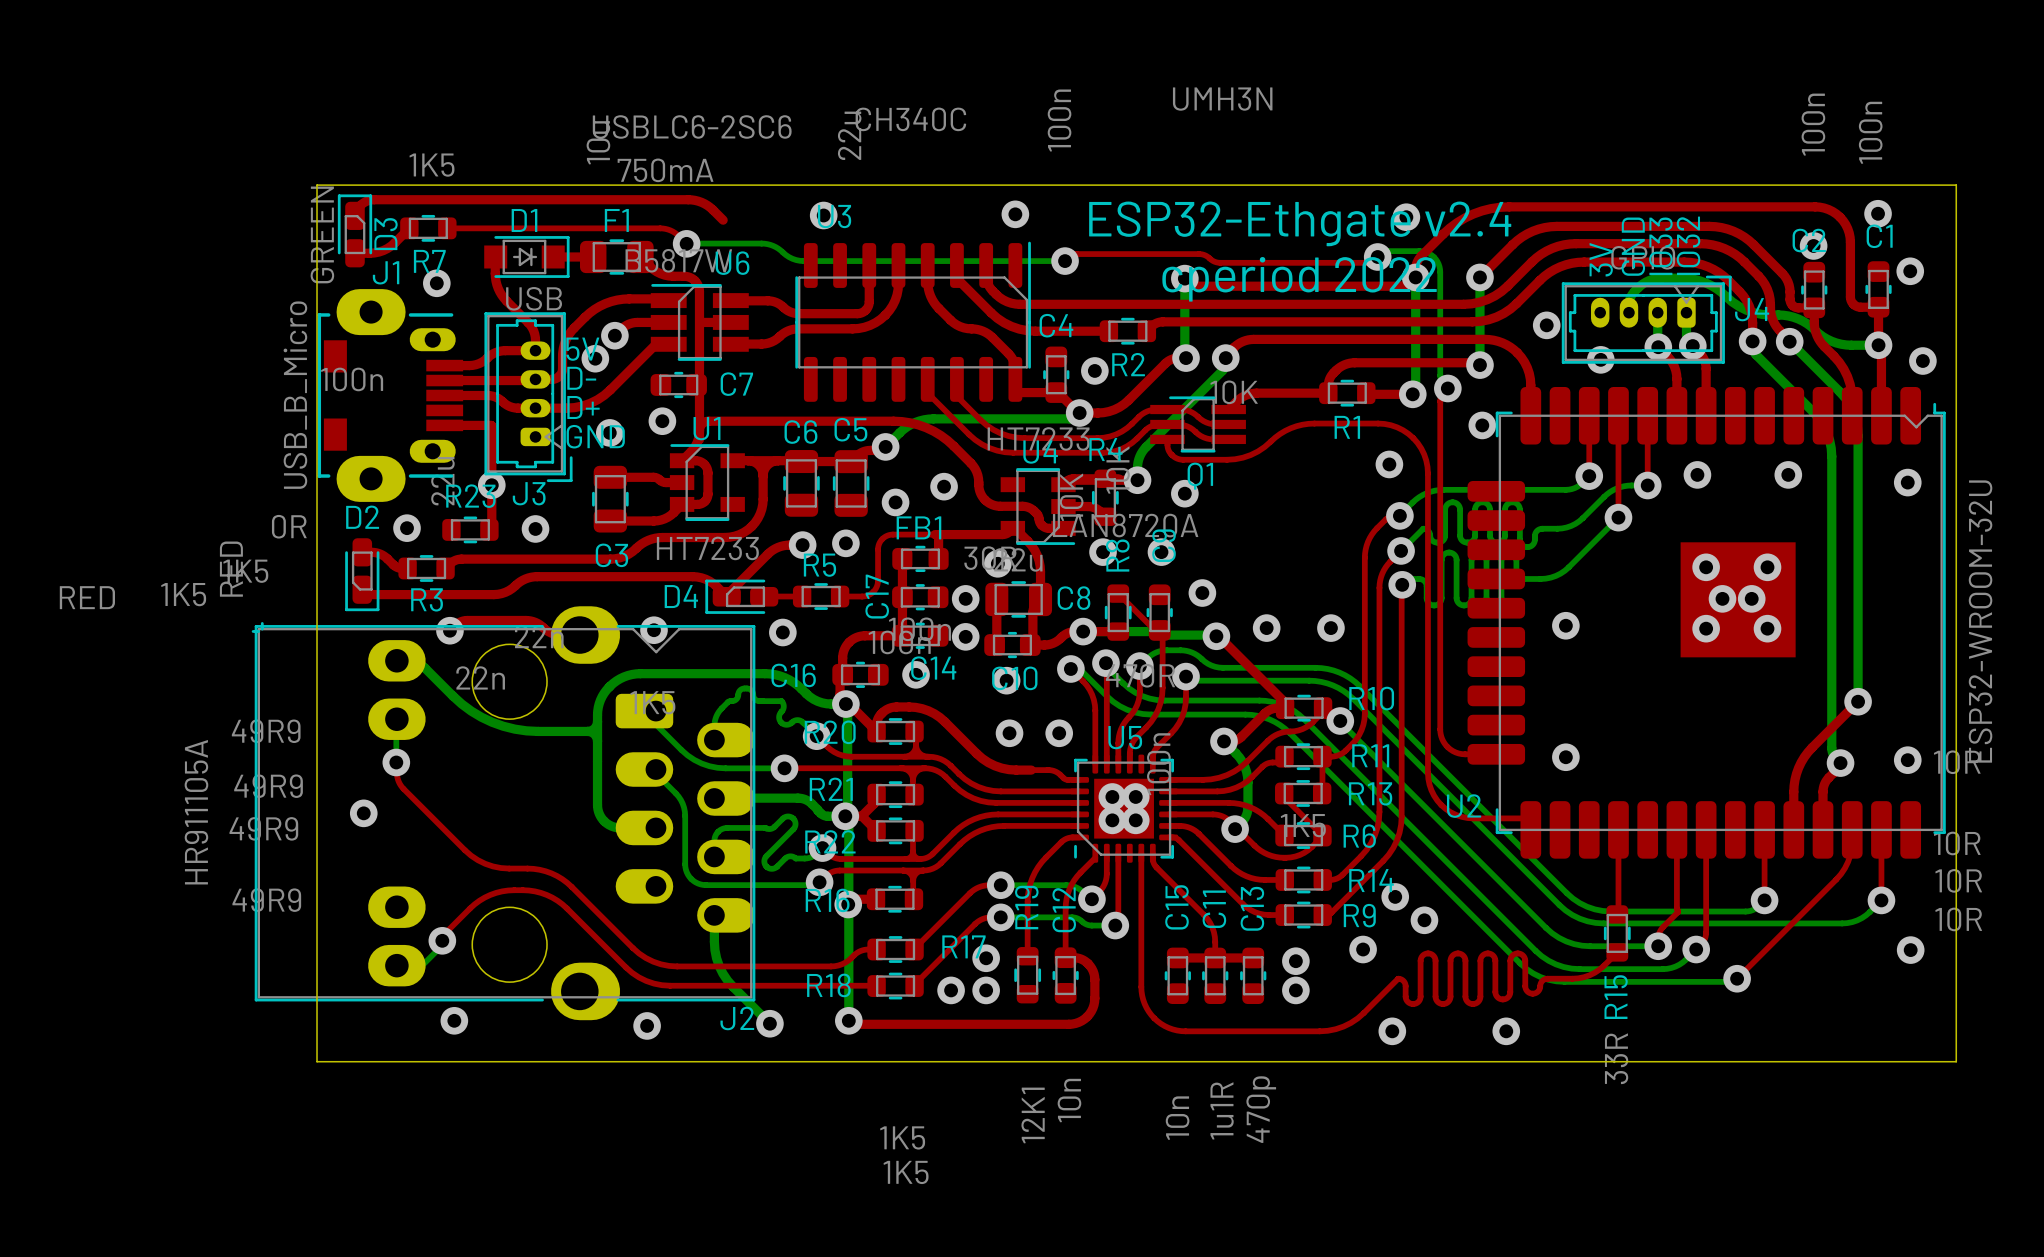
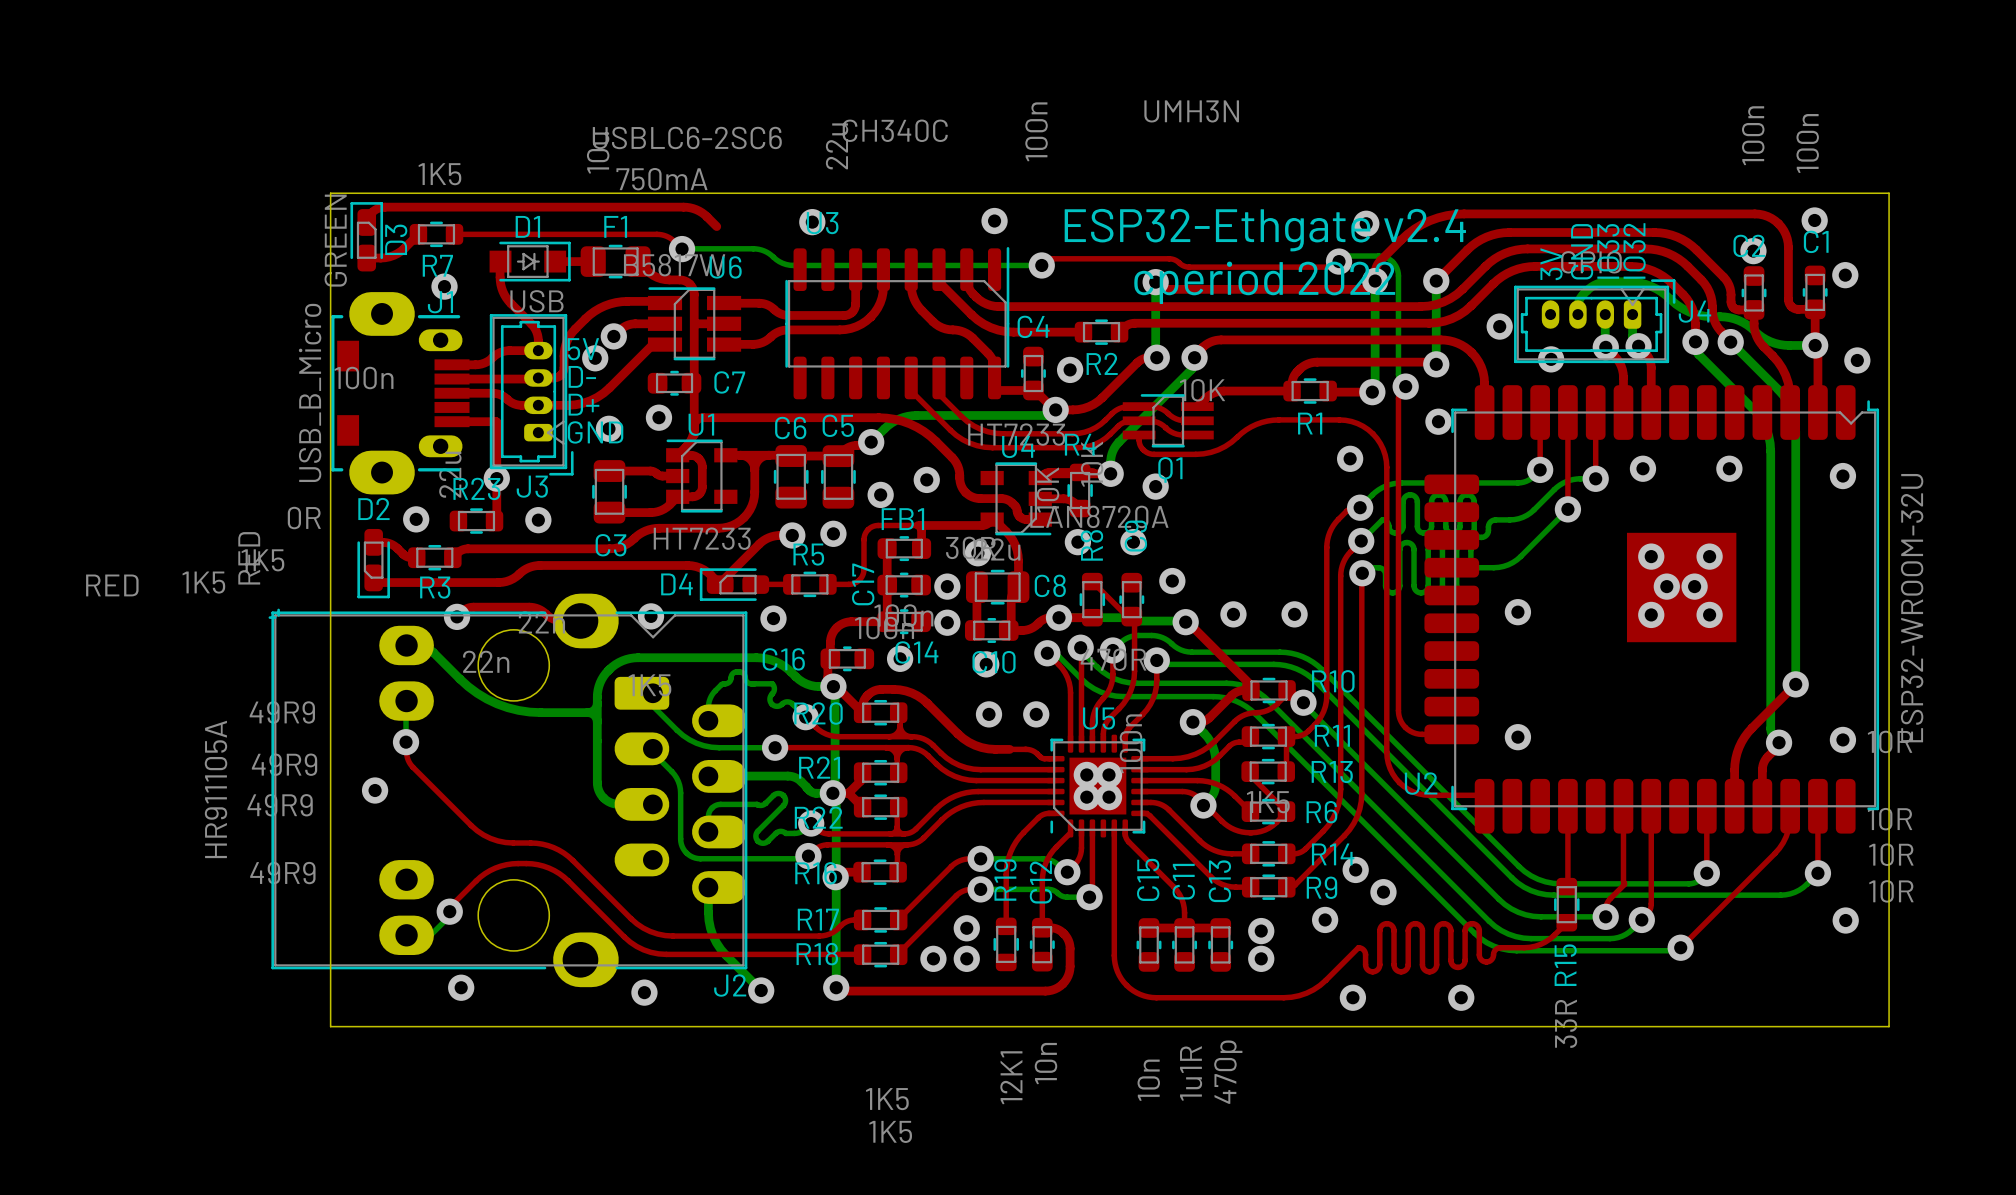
J1 name position: J1 (386, 272) -> J1 (440, 302)
R17 name position: R17 (963, 946) -> R17 (818, 919)

